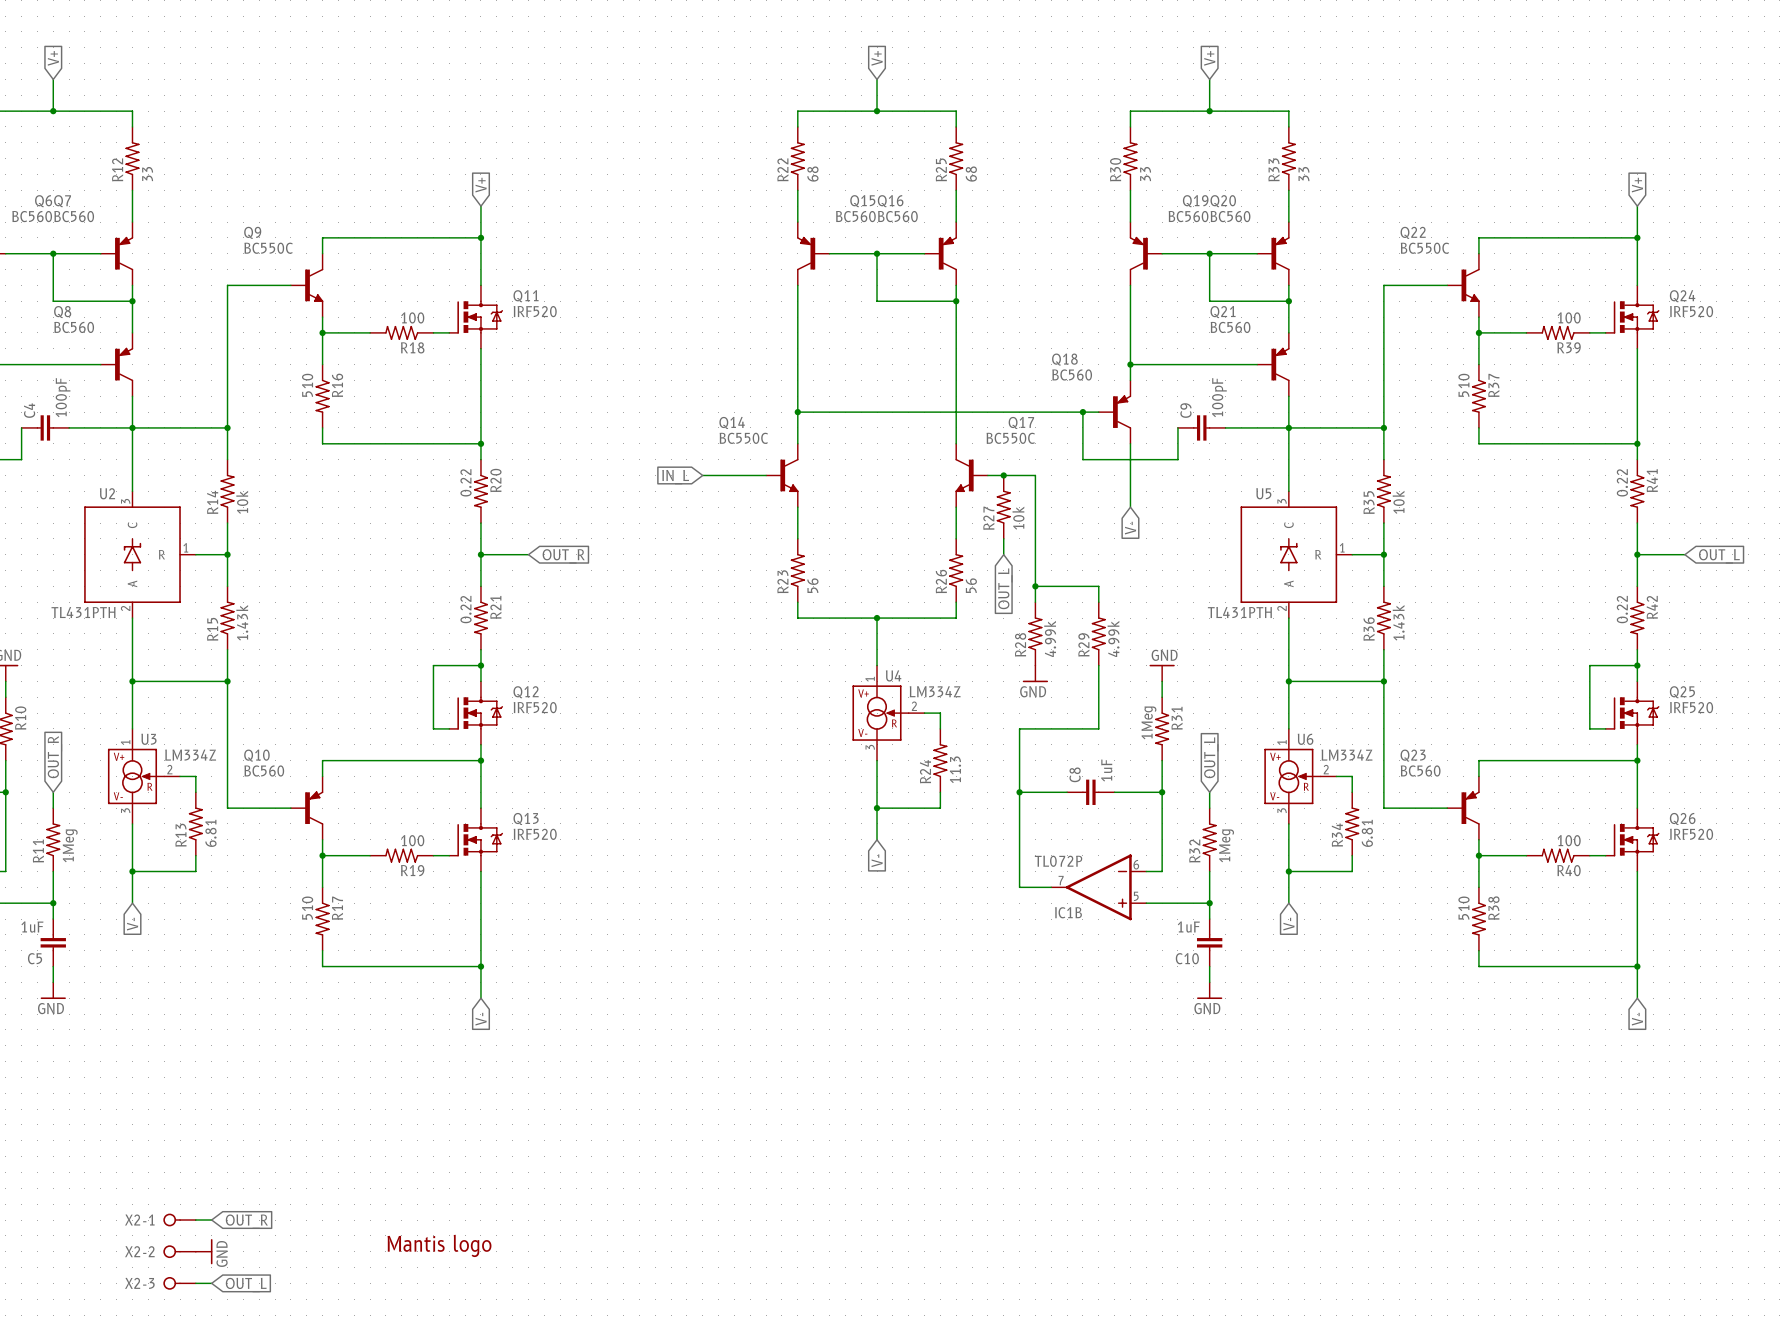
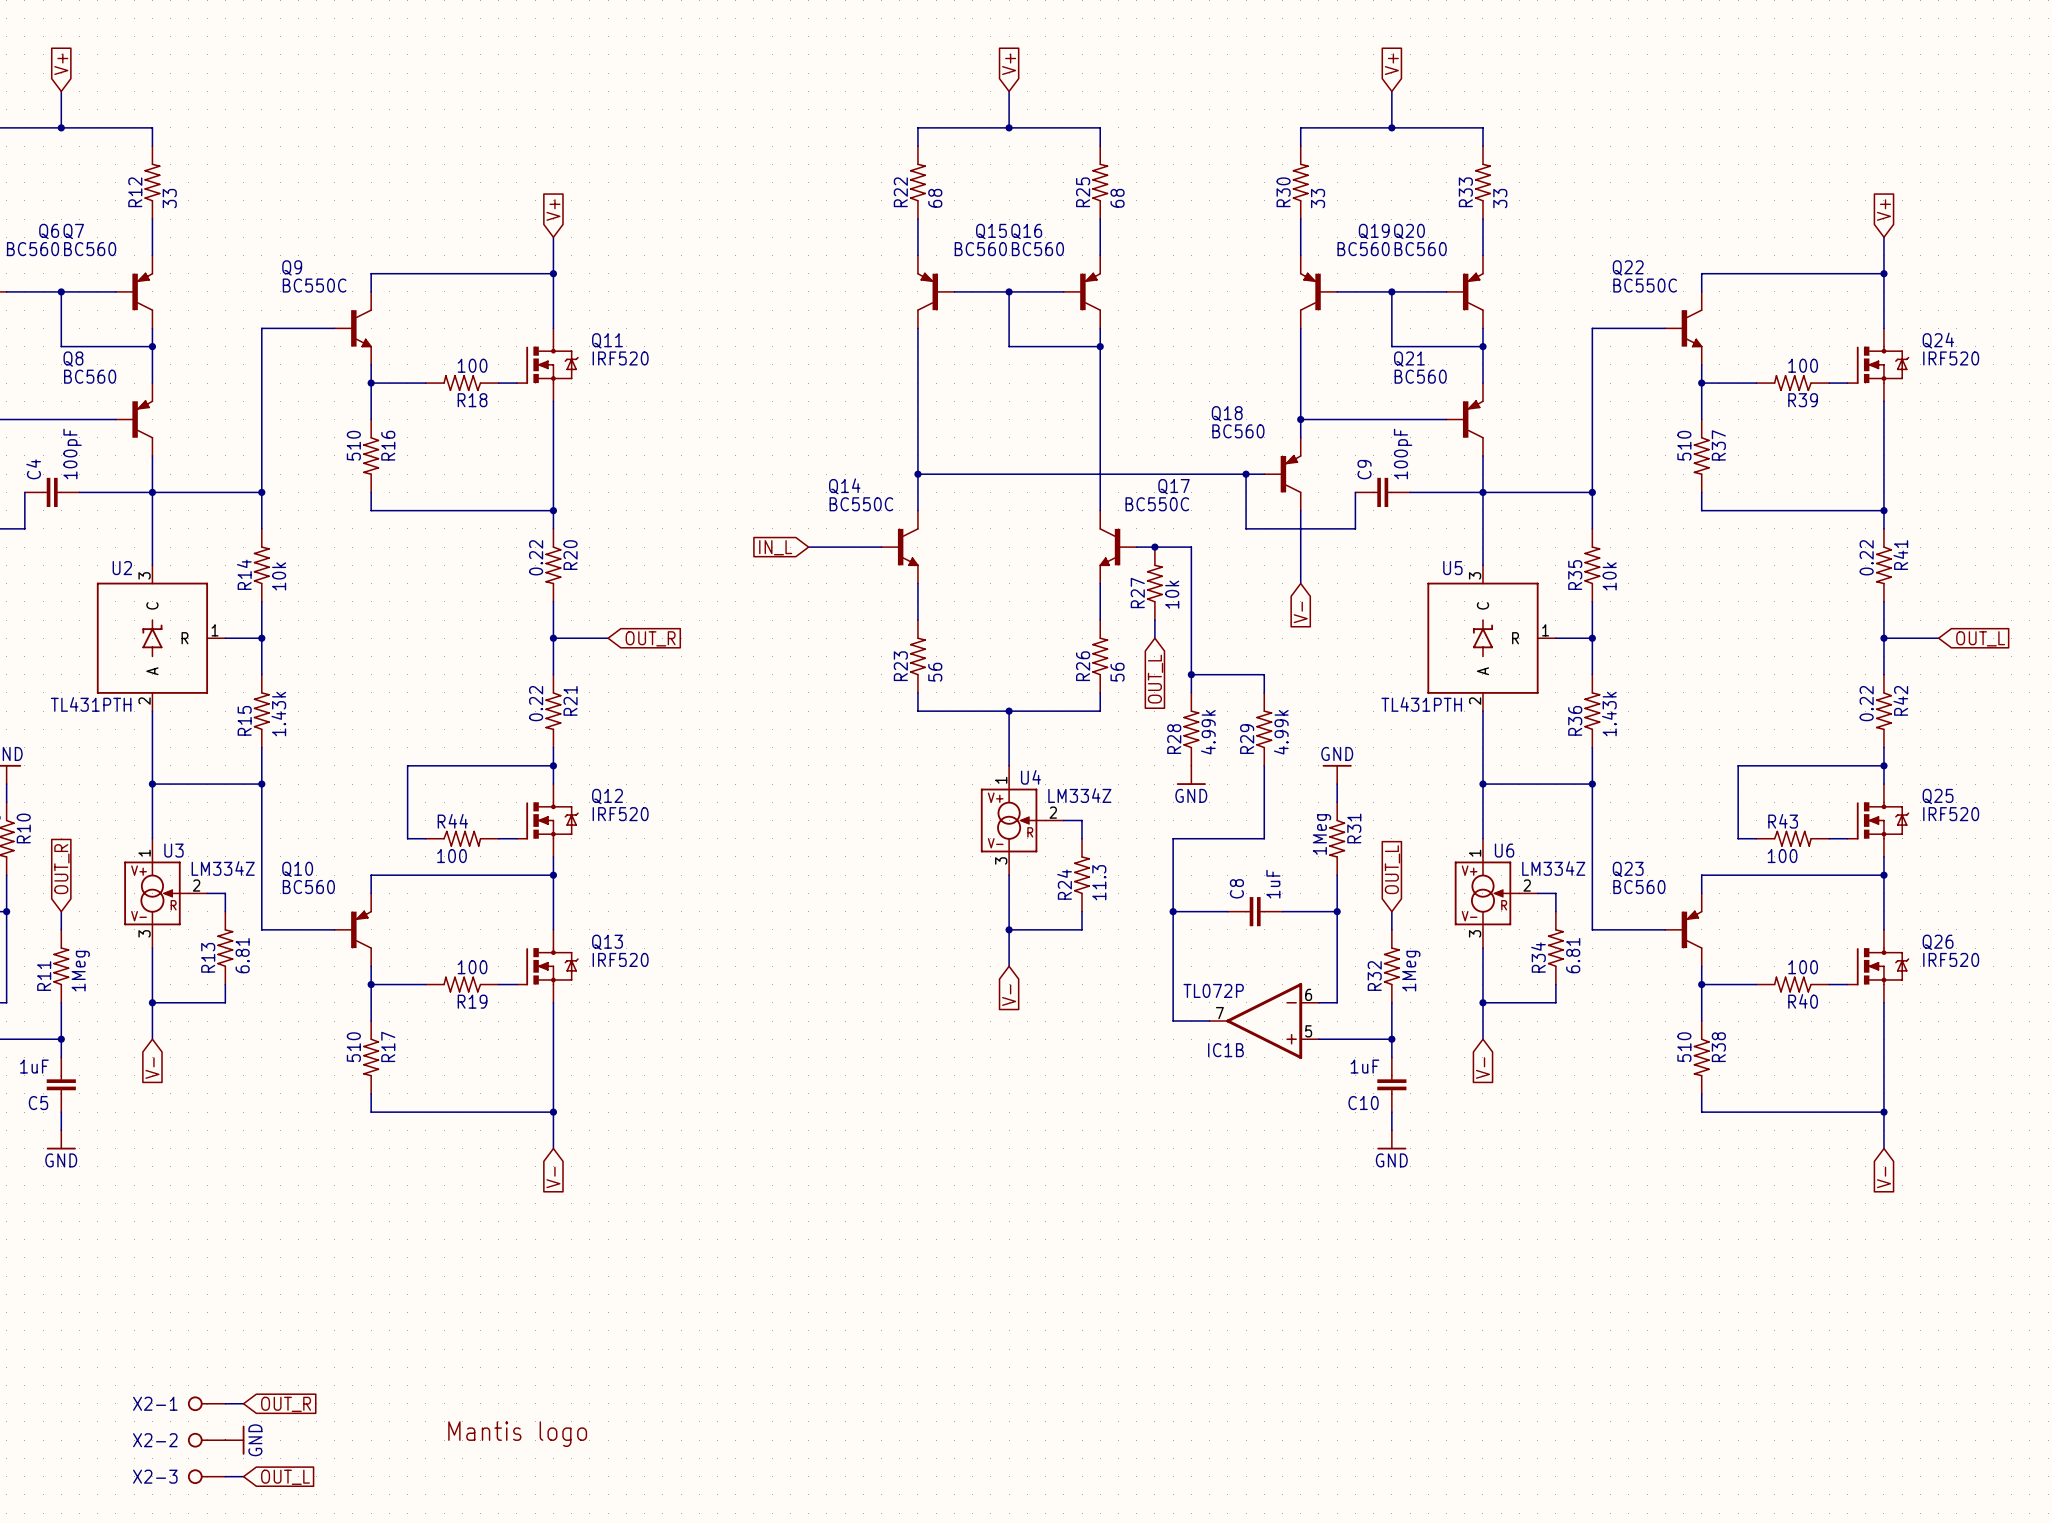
wire: (433, 665) (433, 728) -> (498, 765) (407, 765) (407, 838) (425, 838)
wire: (1589, 665) (1589, 728) -> (1829, 765) (1738, 765) (1738, 838) (1756, 838)
R44: none -> 100 (462, 838)
R43: none -> 100 (1792, 838)

